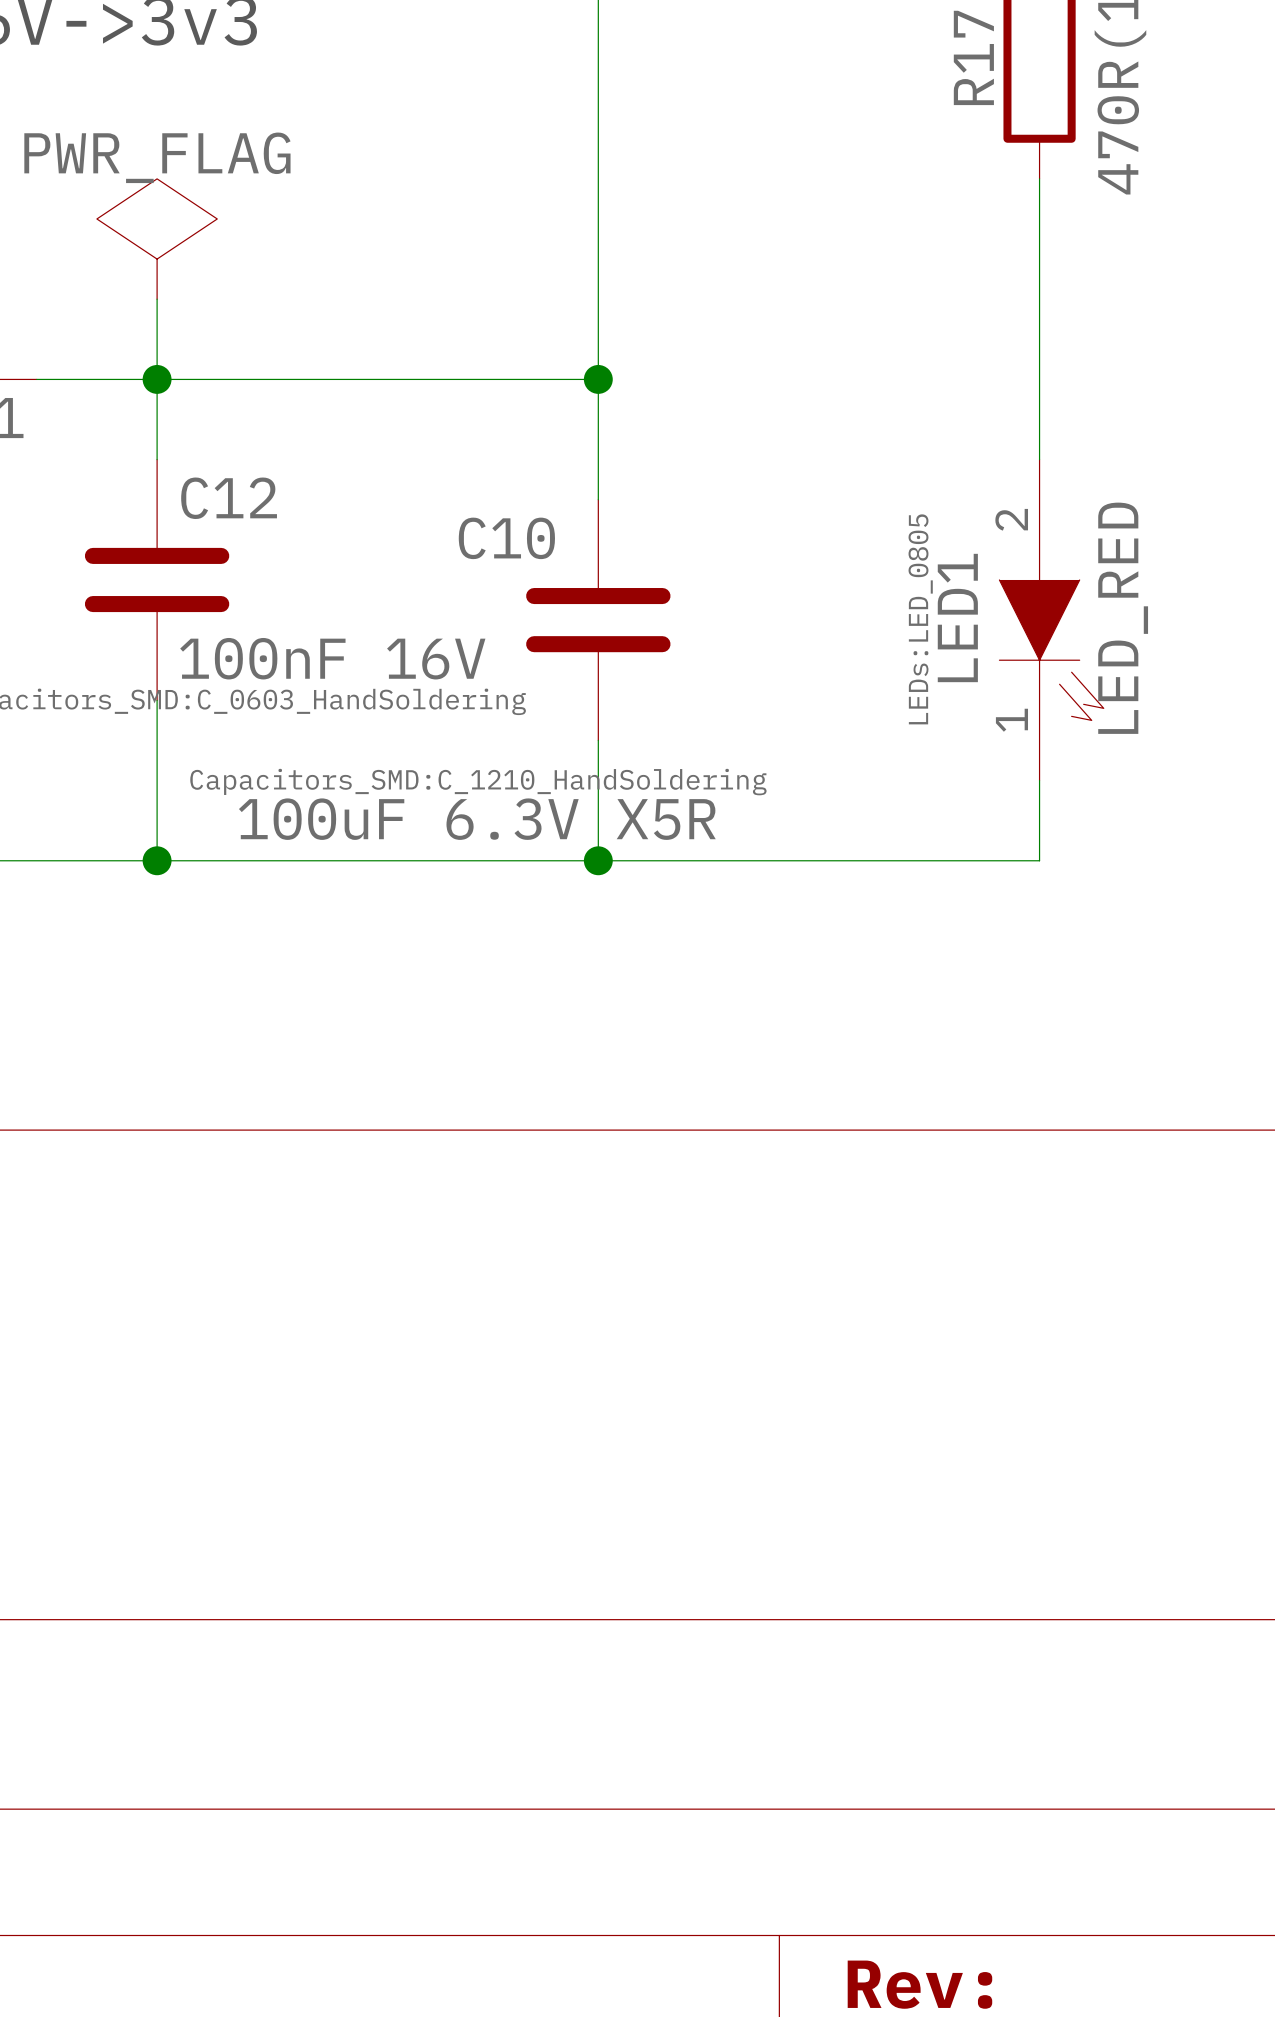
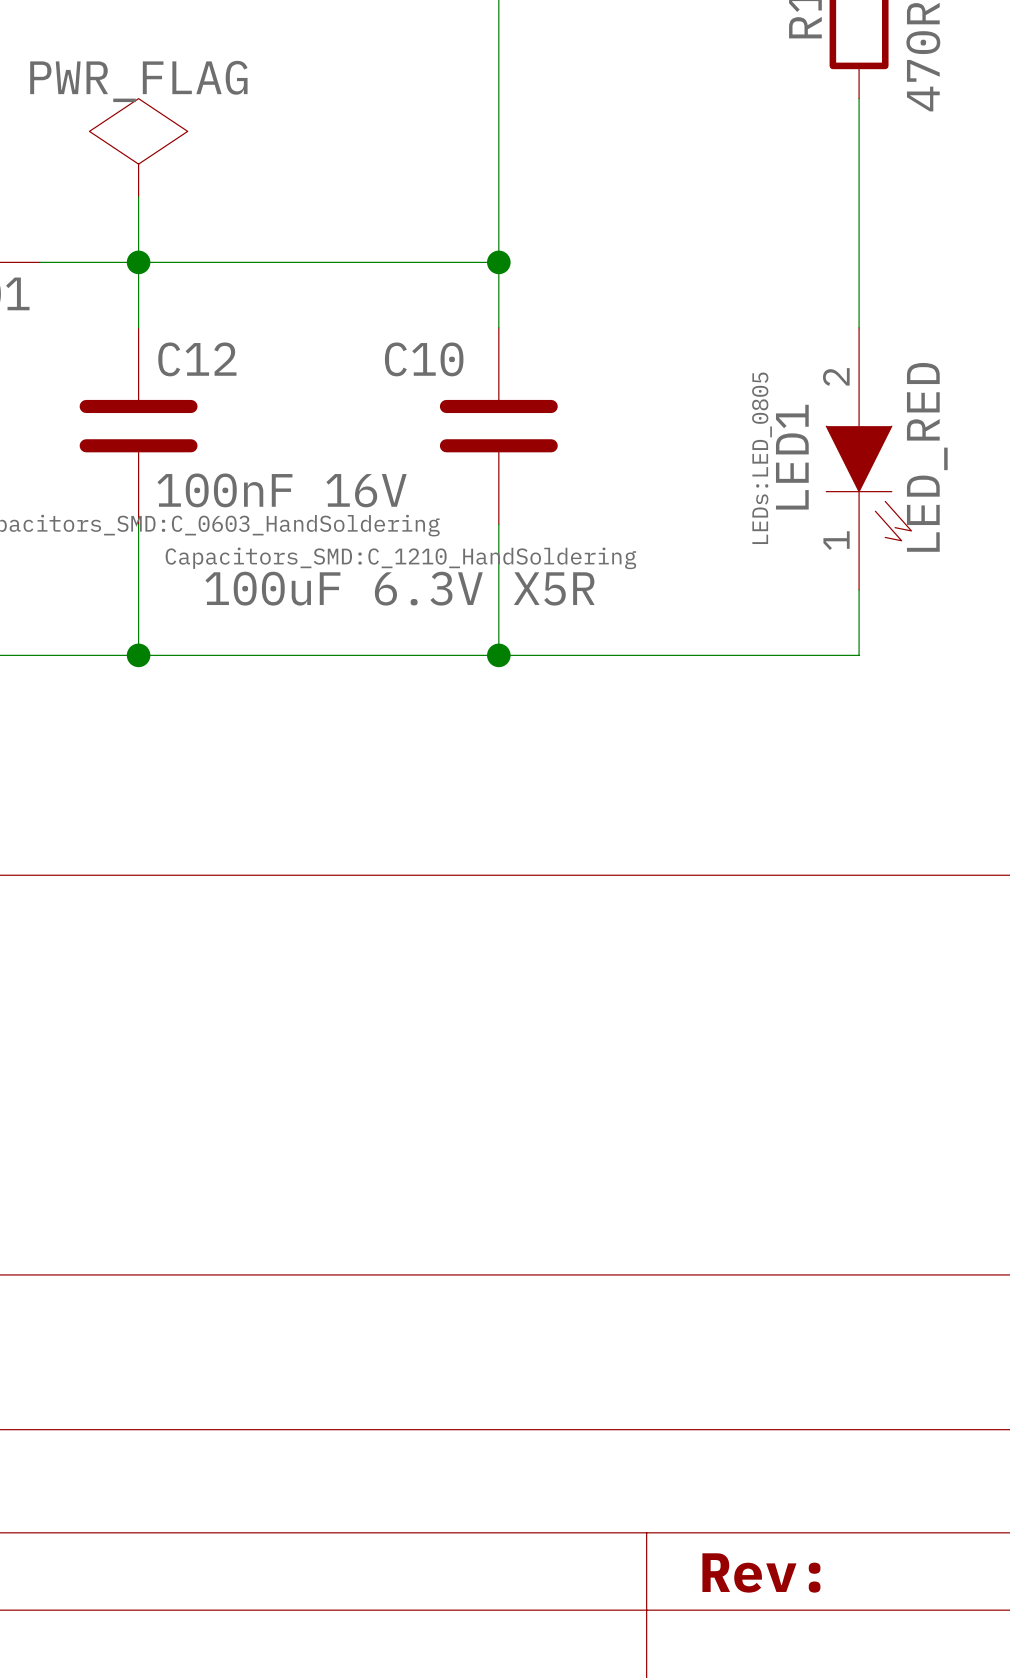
C10 position: (598, 620) -> (498, 426)

